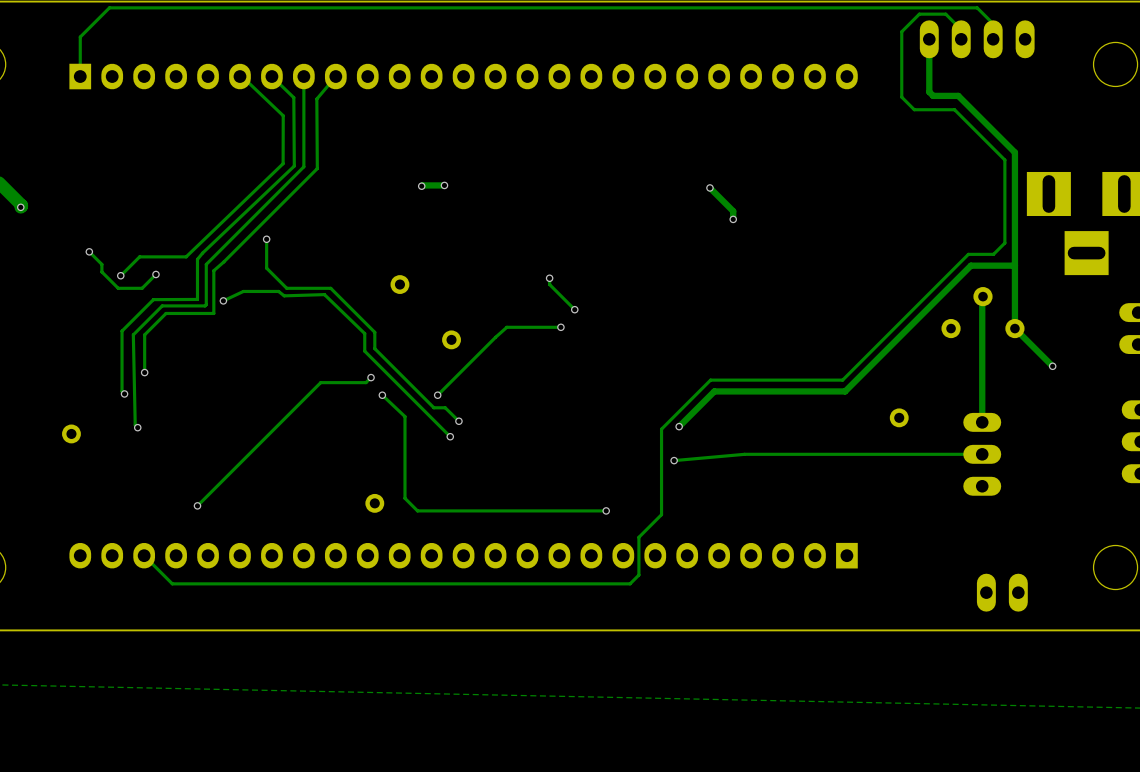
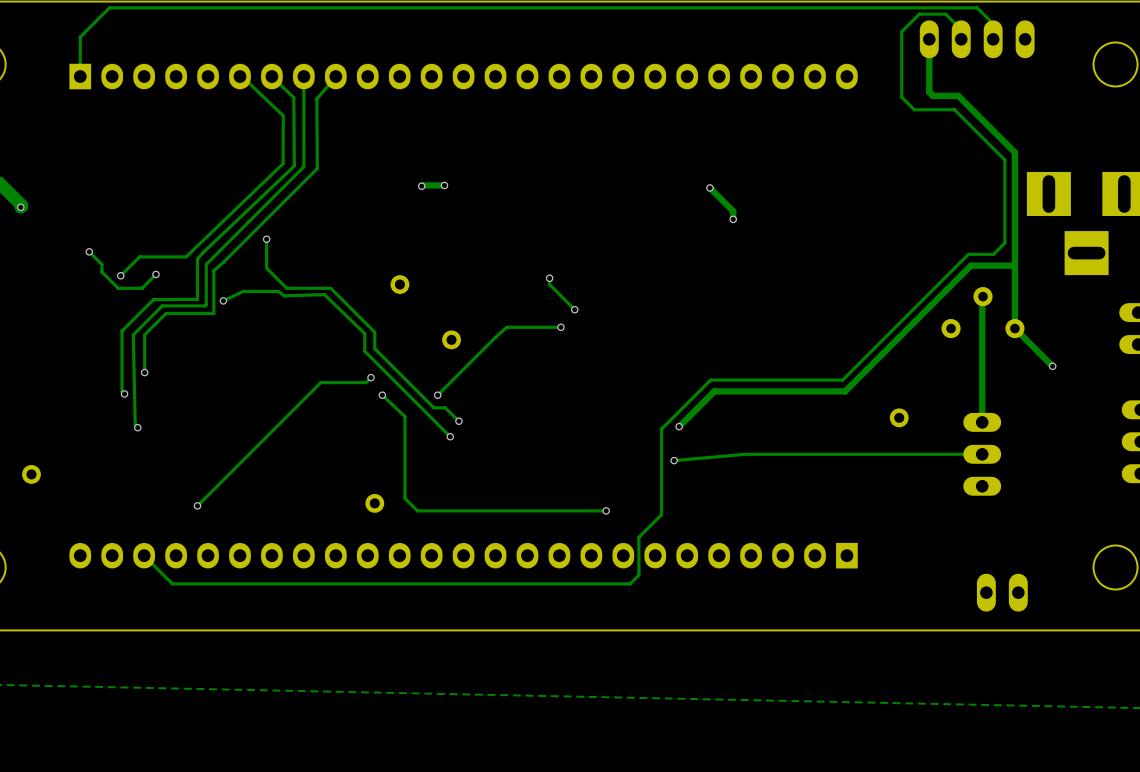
part position: (71, 433) -> (31, 474)

